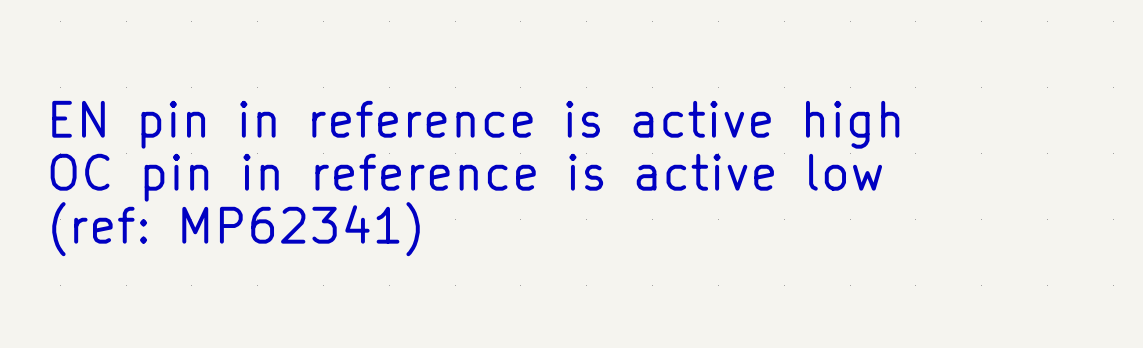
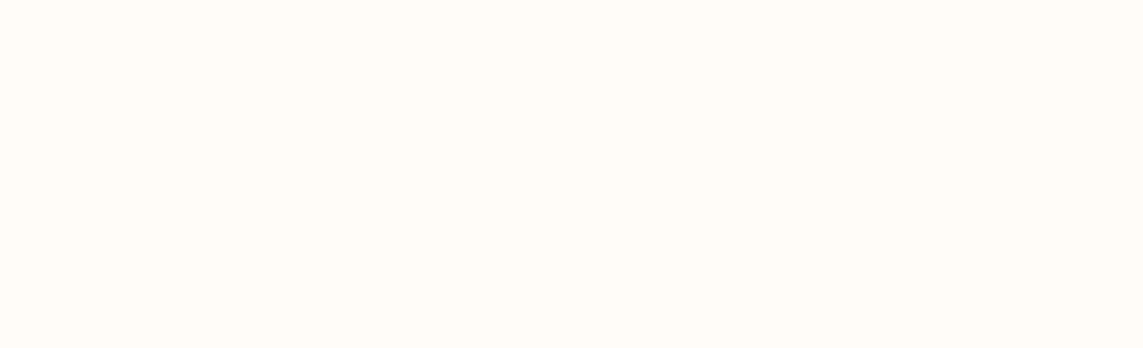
text: EN pin in reference is active high (475, 124) -> none
text: OC pin in reference is active low (466, 177) -> none
text: (ref: MP62341) (236, 229) -> none

